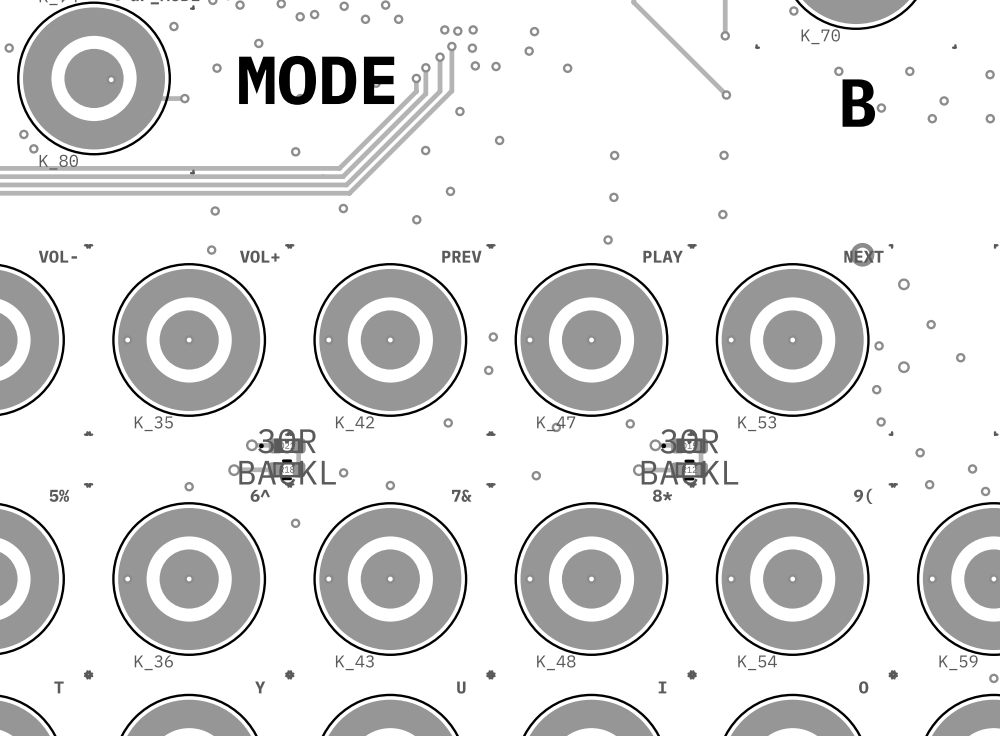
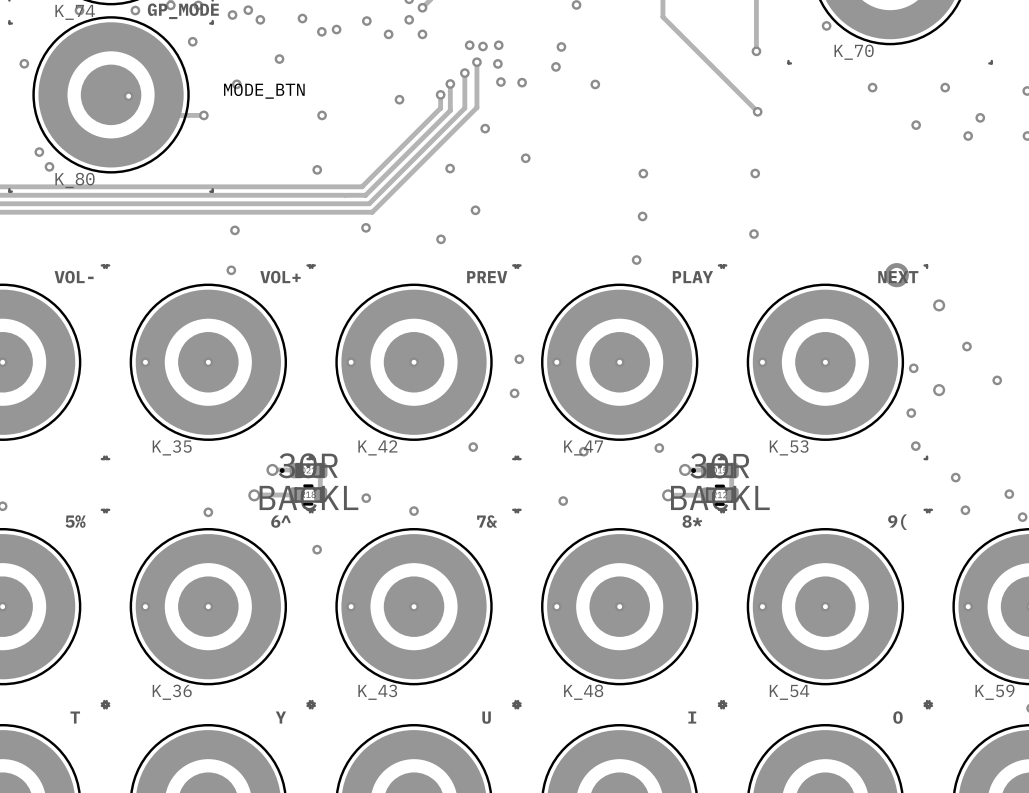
text: none -> MODE_BTN (264, 91)
K_80 text: MODE (316, 80) -> none
K_70 text: B (858, 103) -> none

